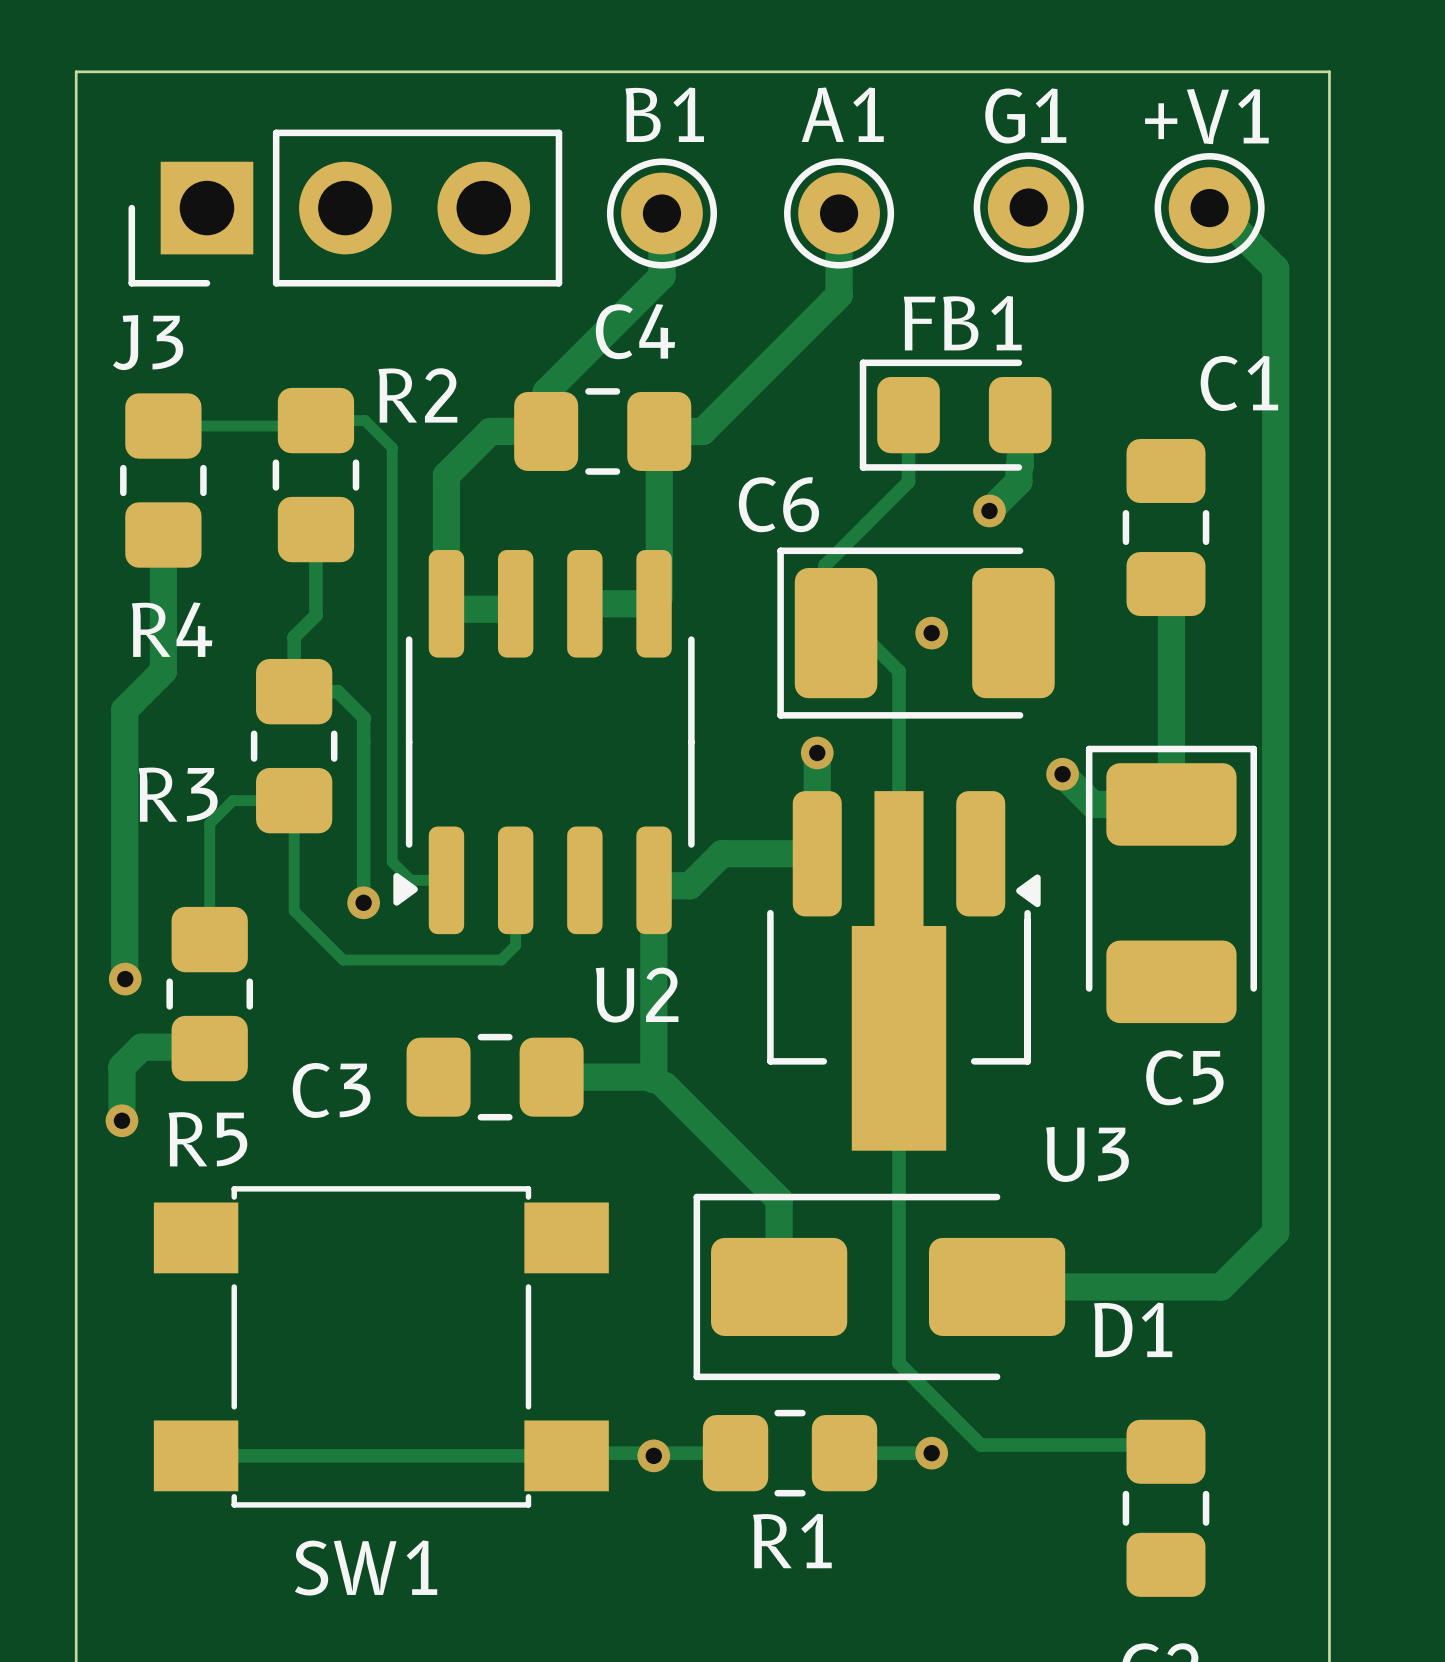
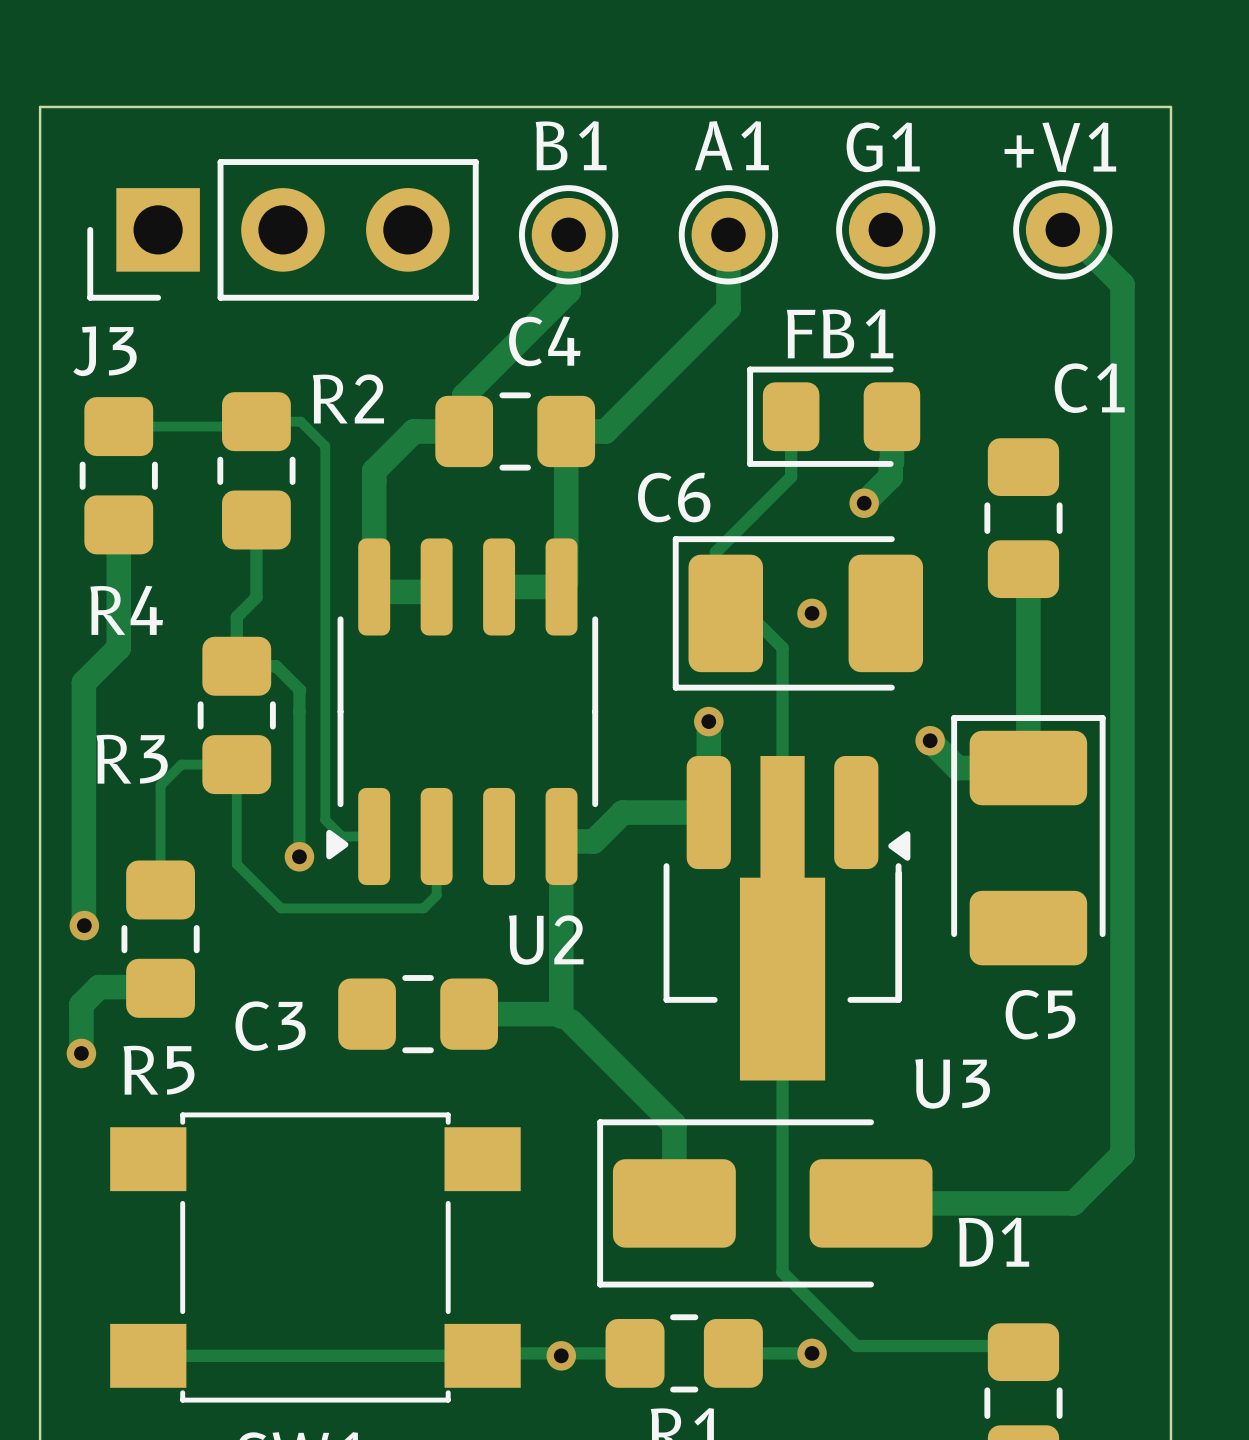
G1 position: (1028, 207) -> (885, 229)

